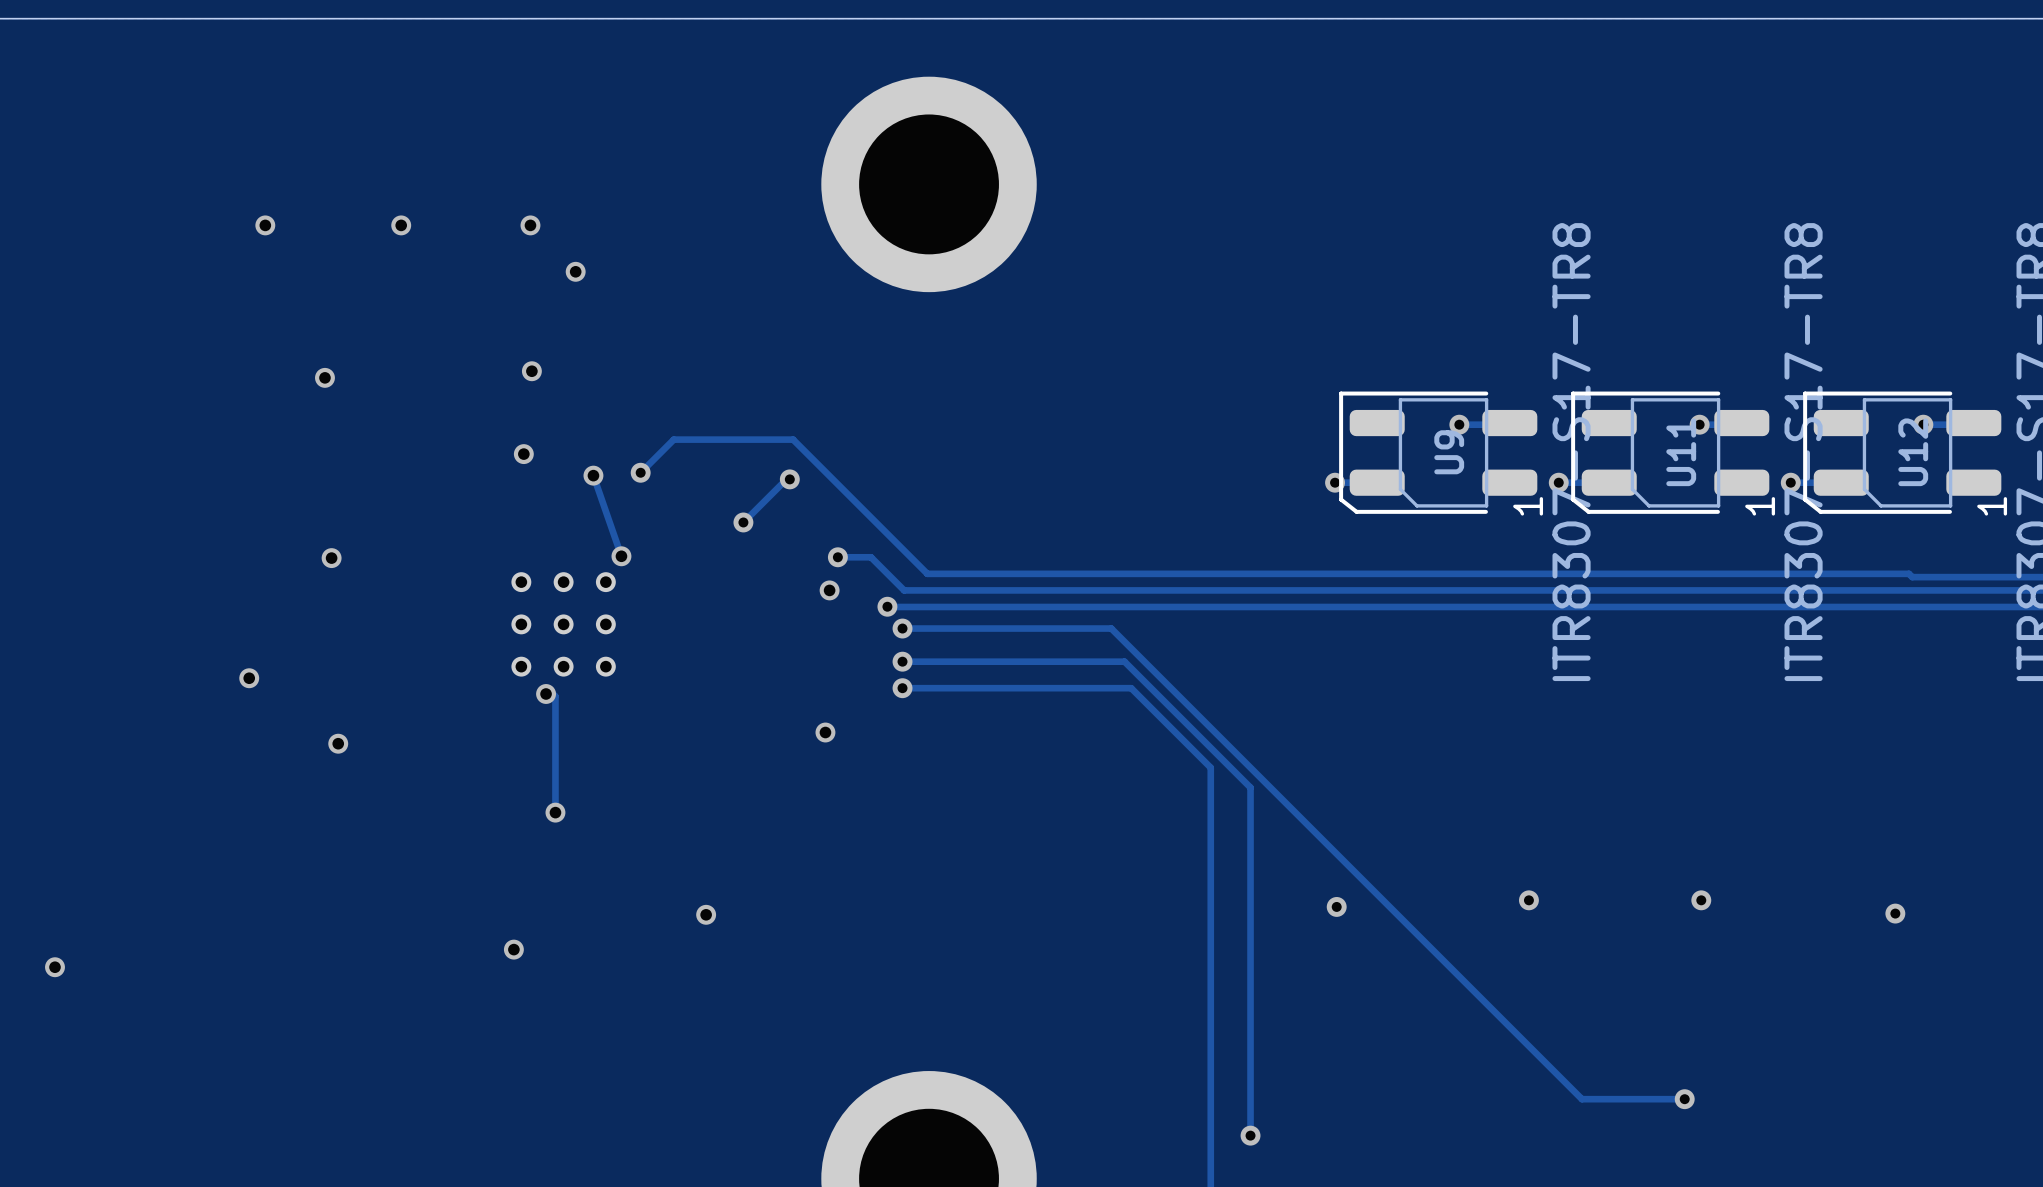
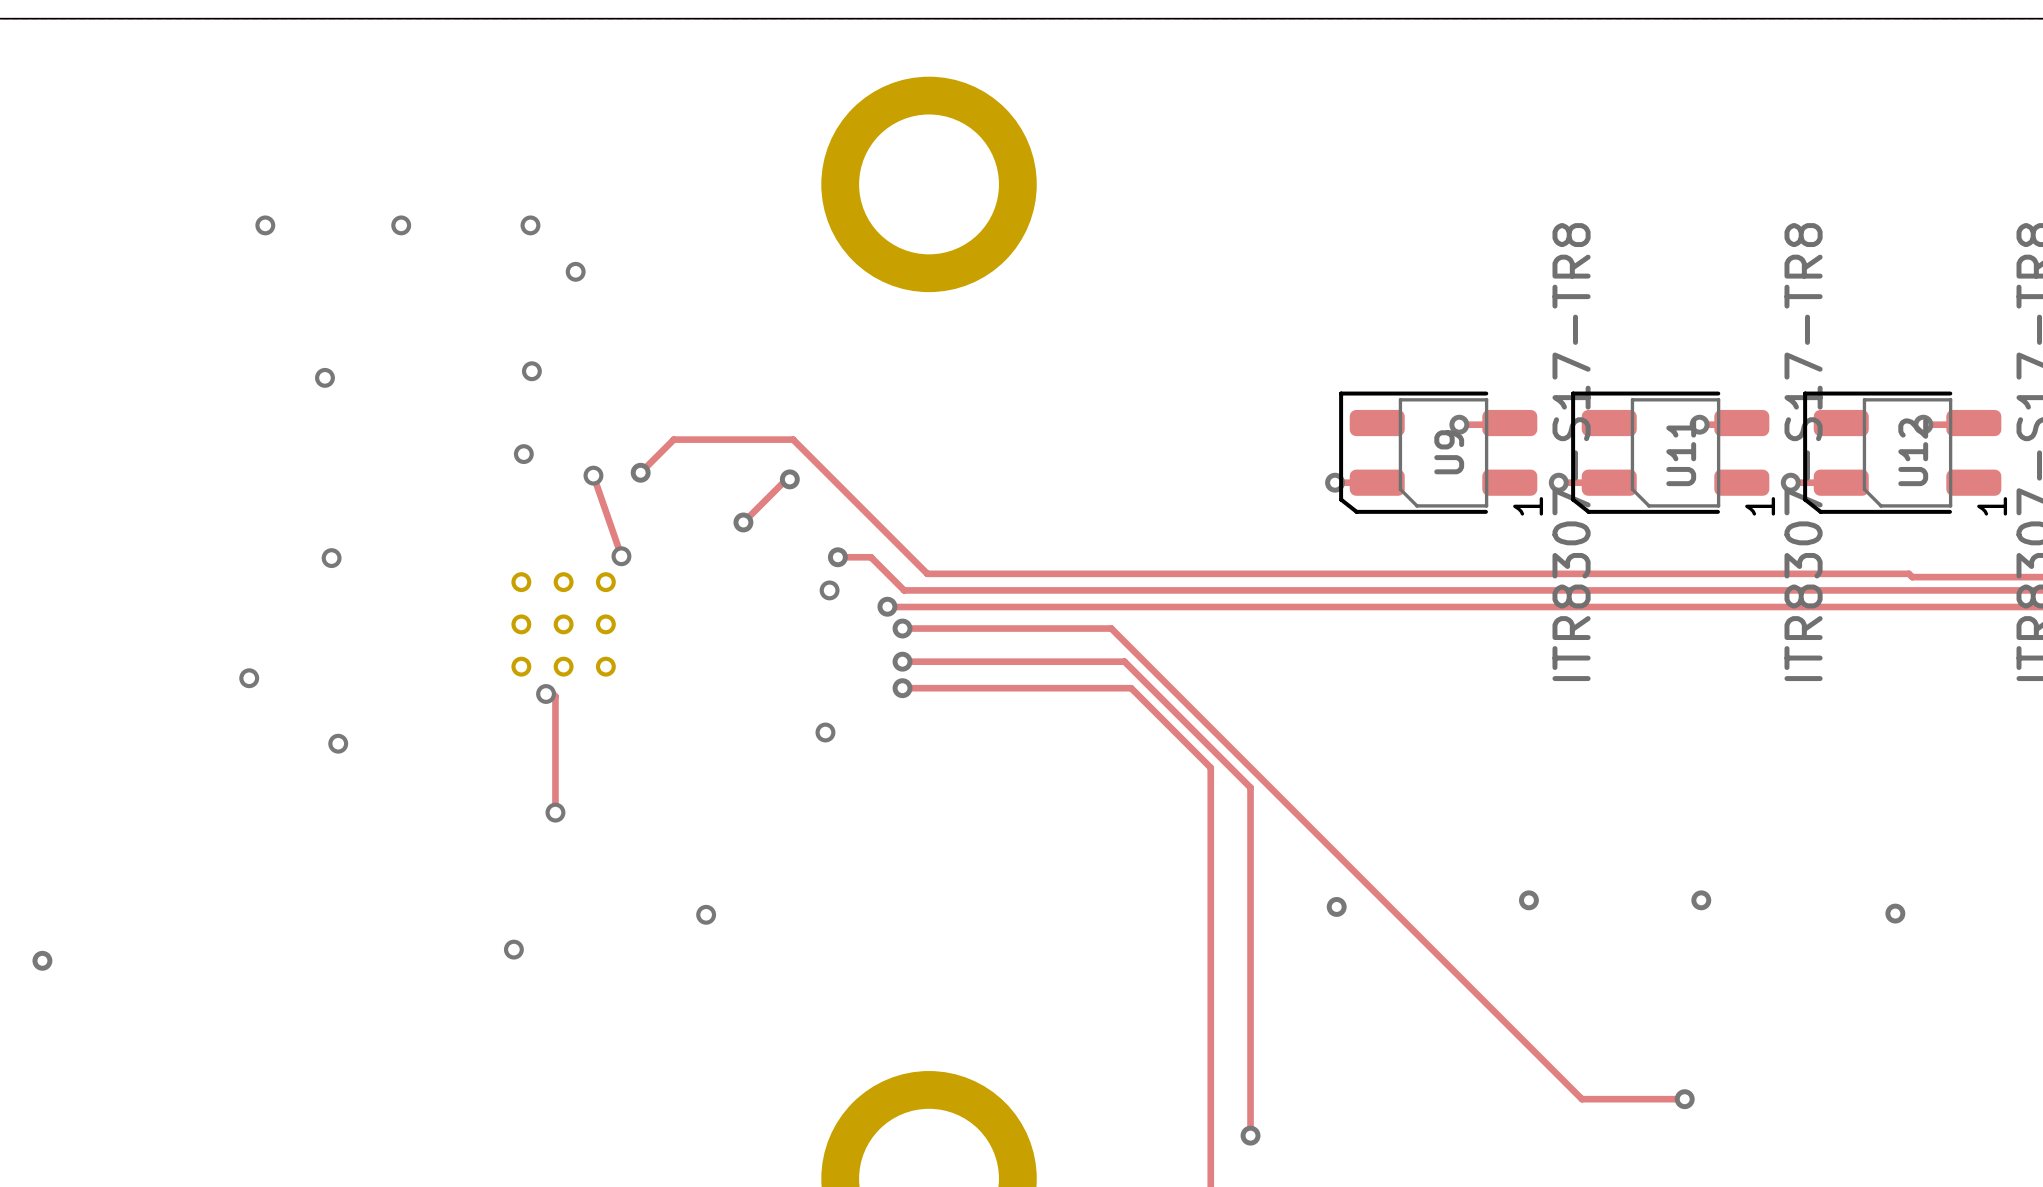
via position: (55, 967) -> (42, 960)

